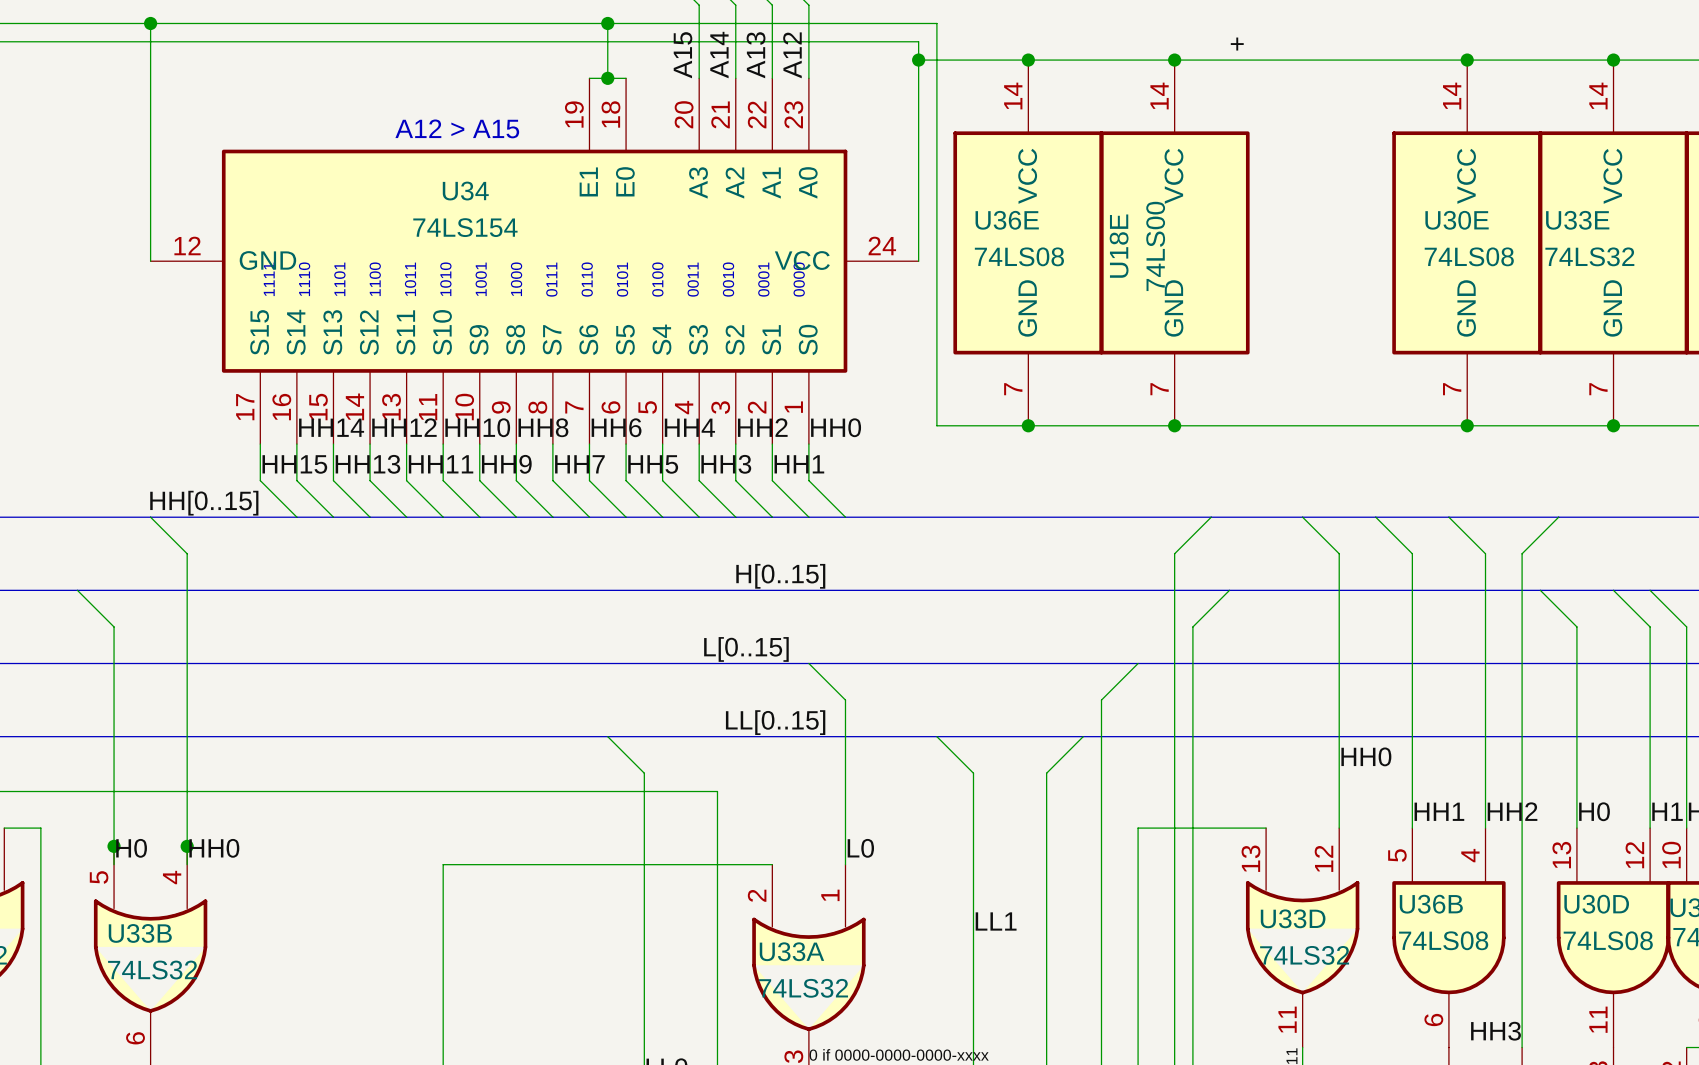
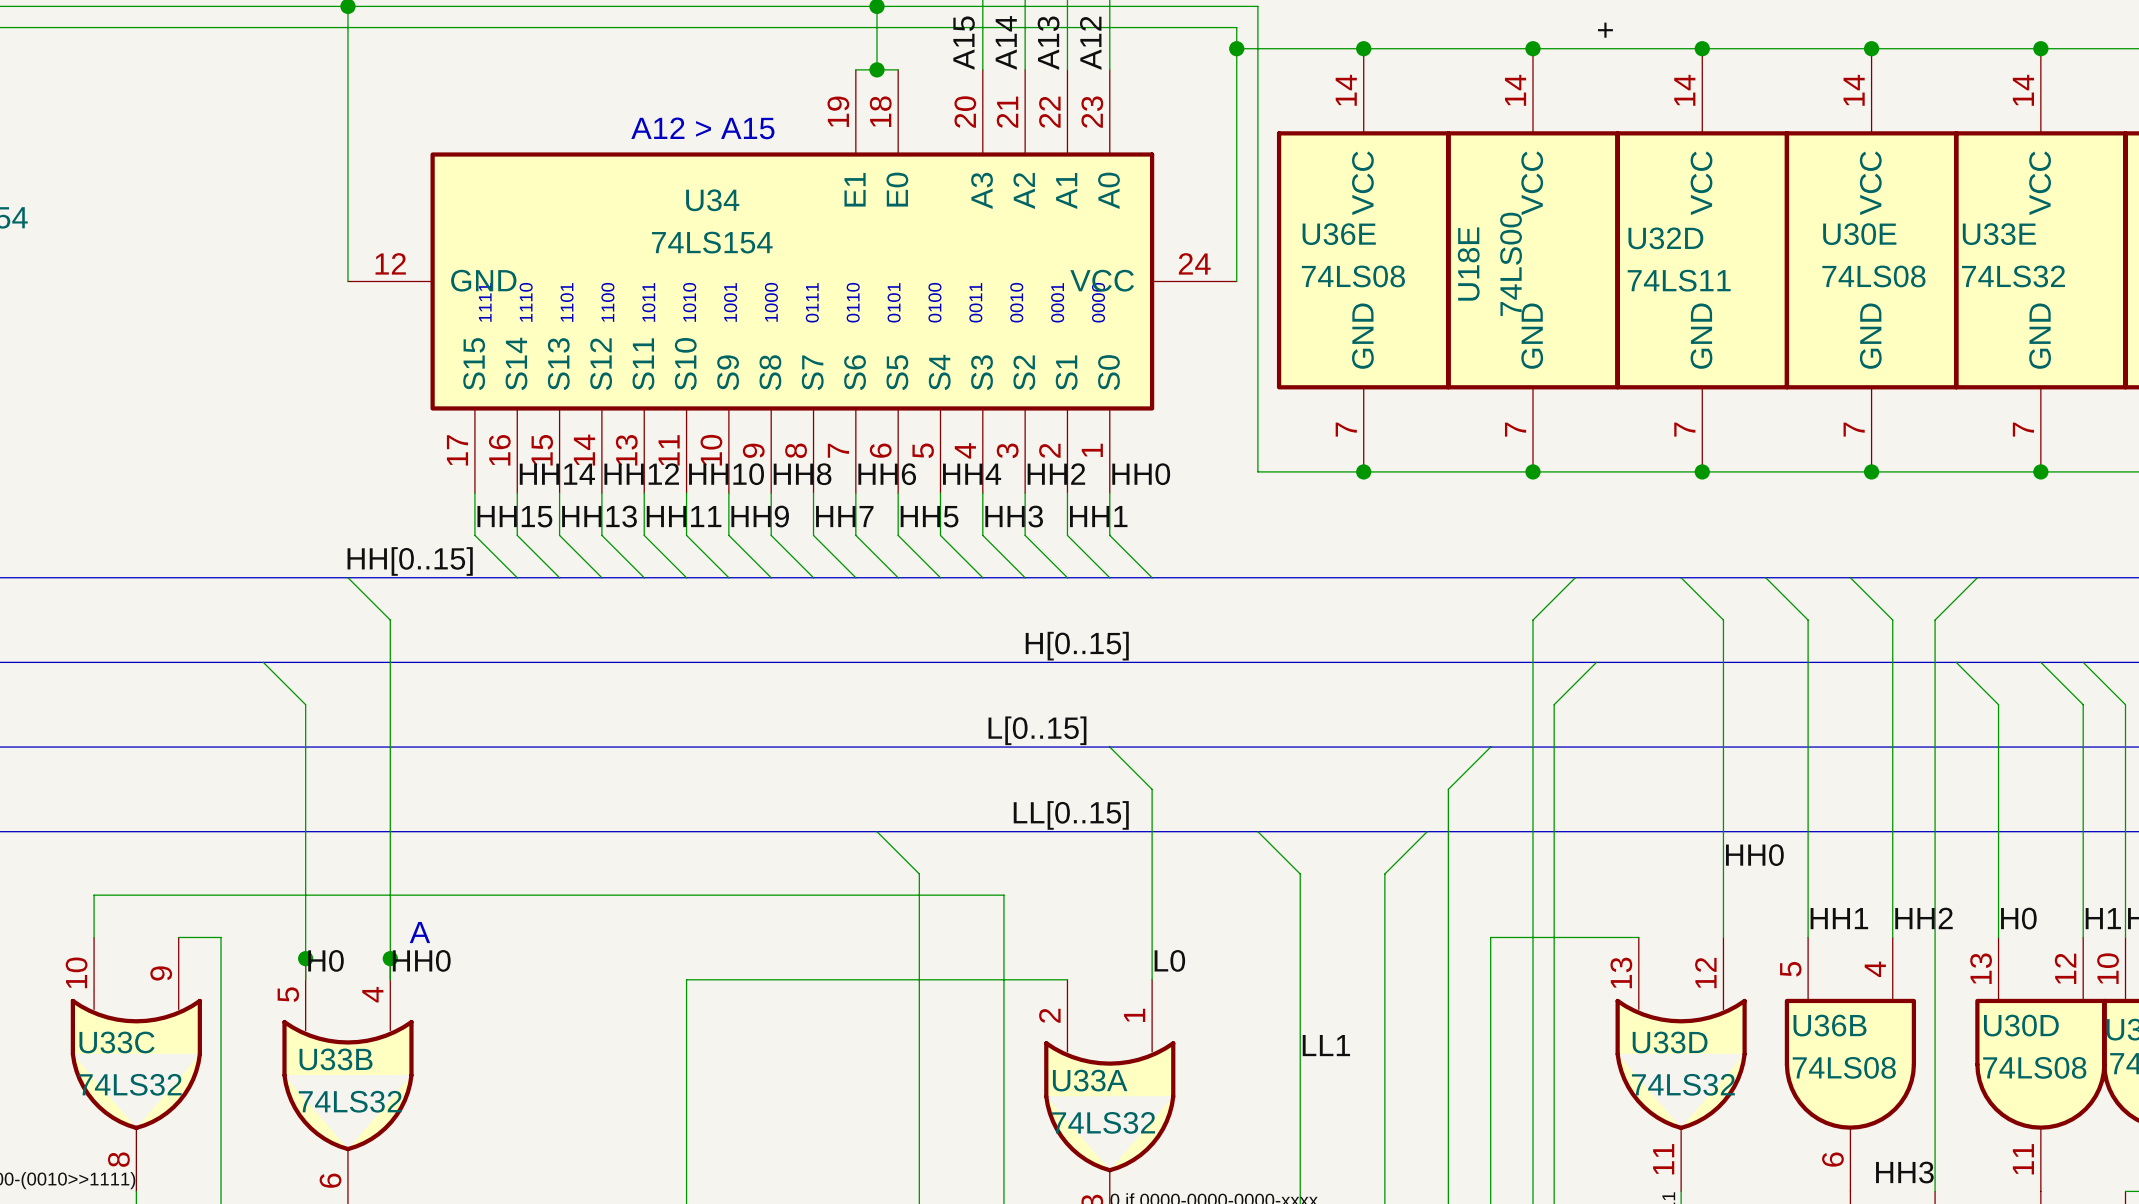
junction: none -> (1702, 48)
U32D: none -> 74LS11 (1702, 260)
junction: none -> (1702, 471)
text: none -> A (419, 932)

